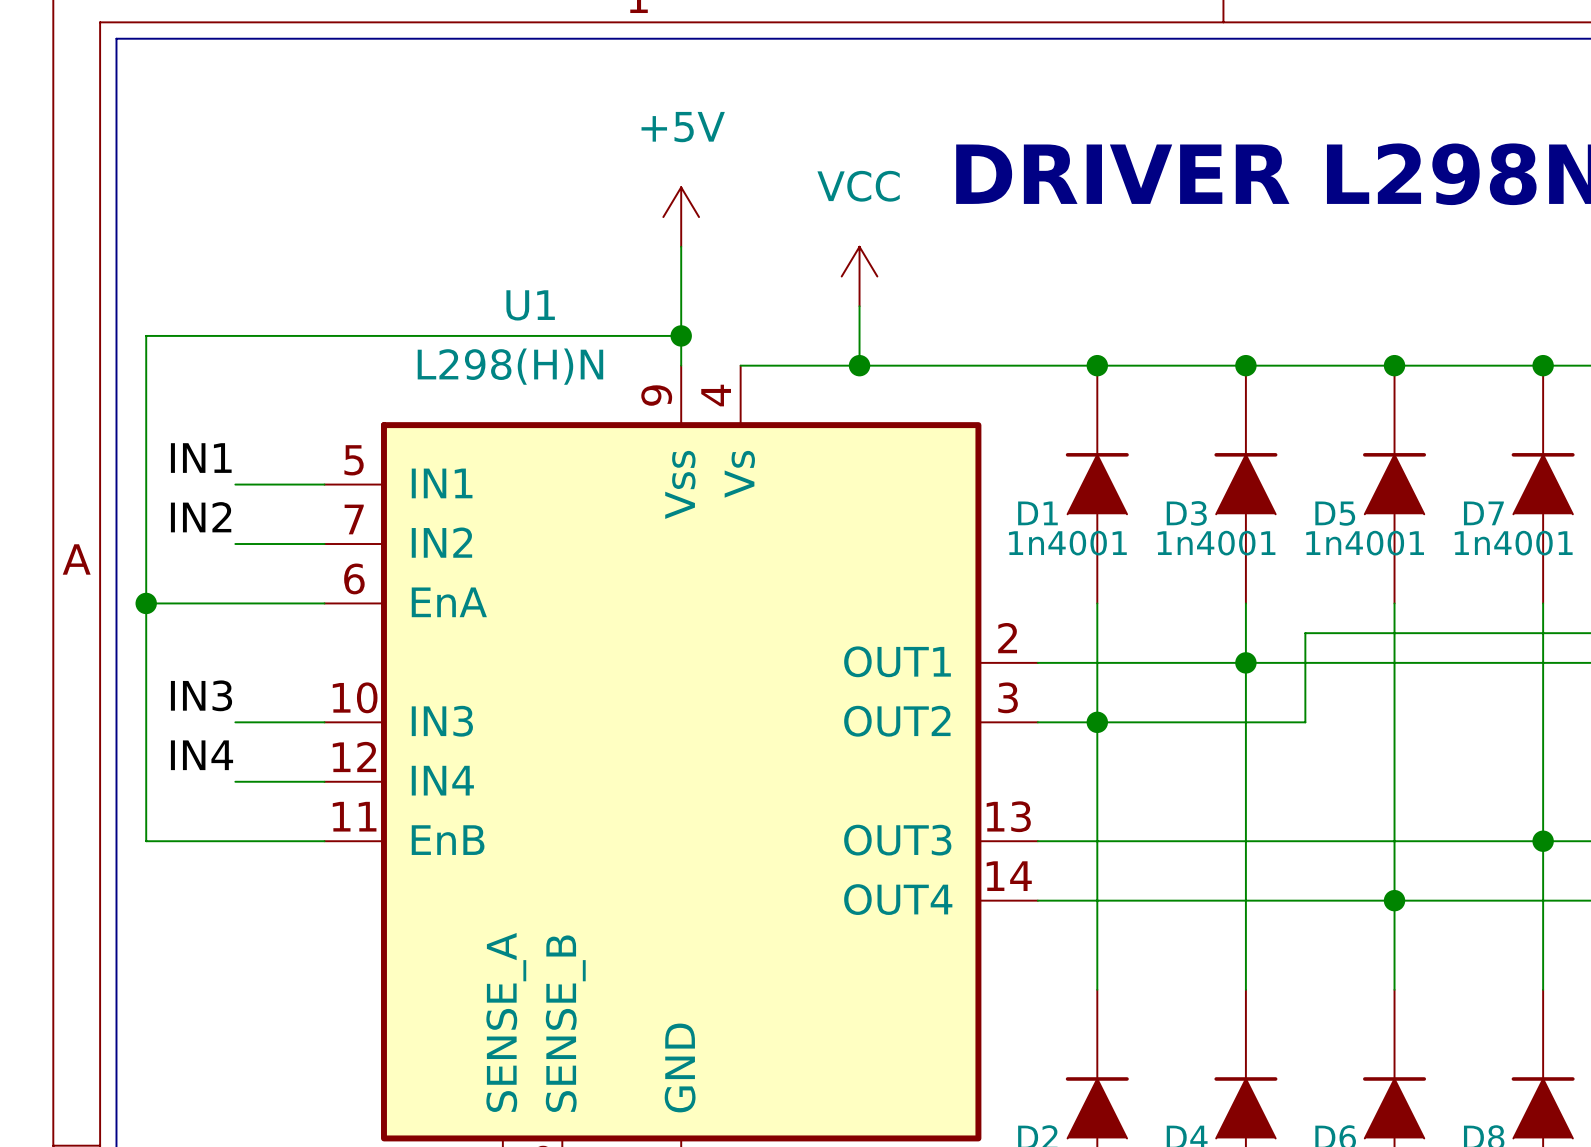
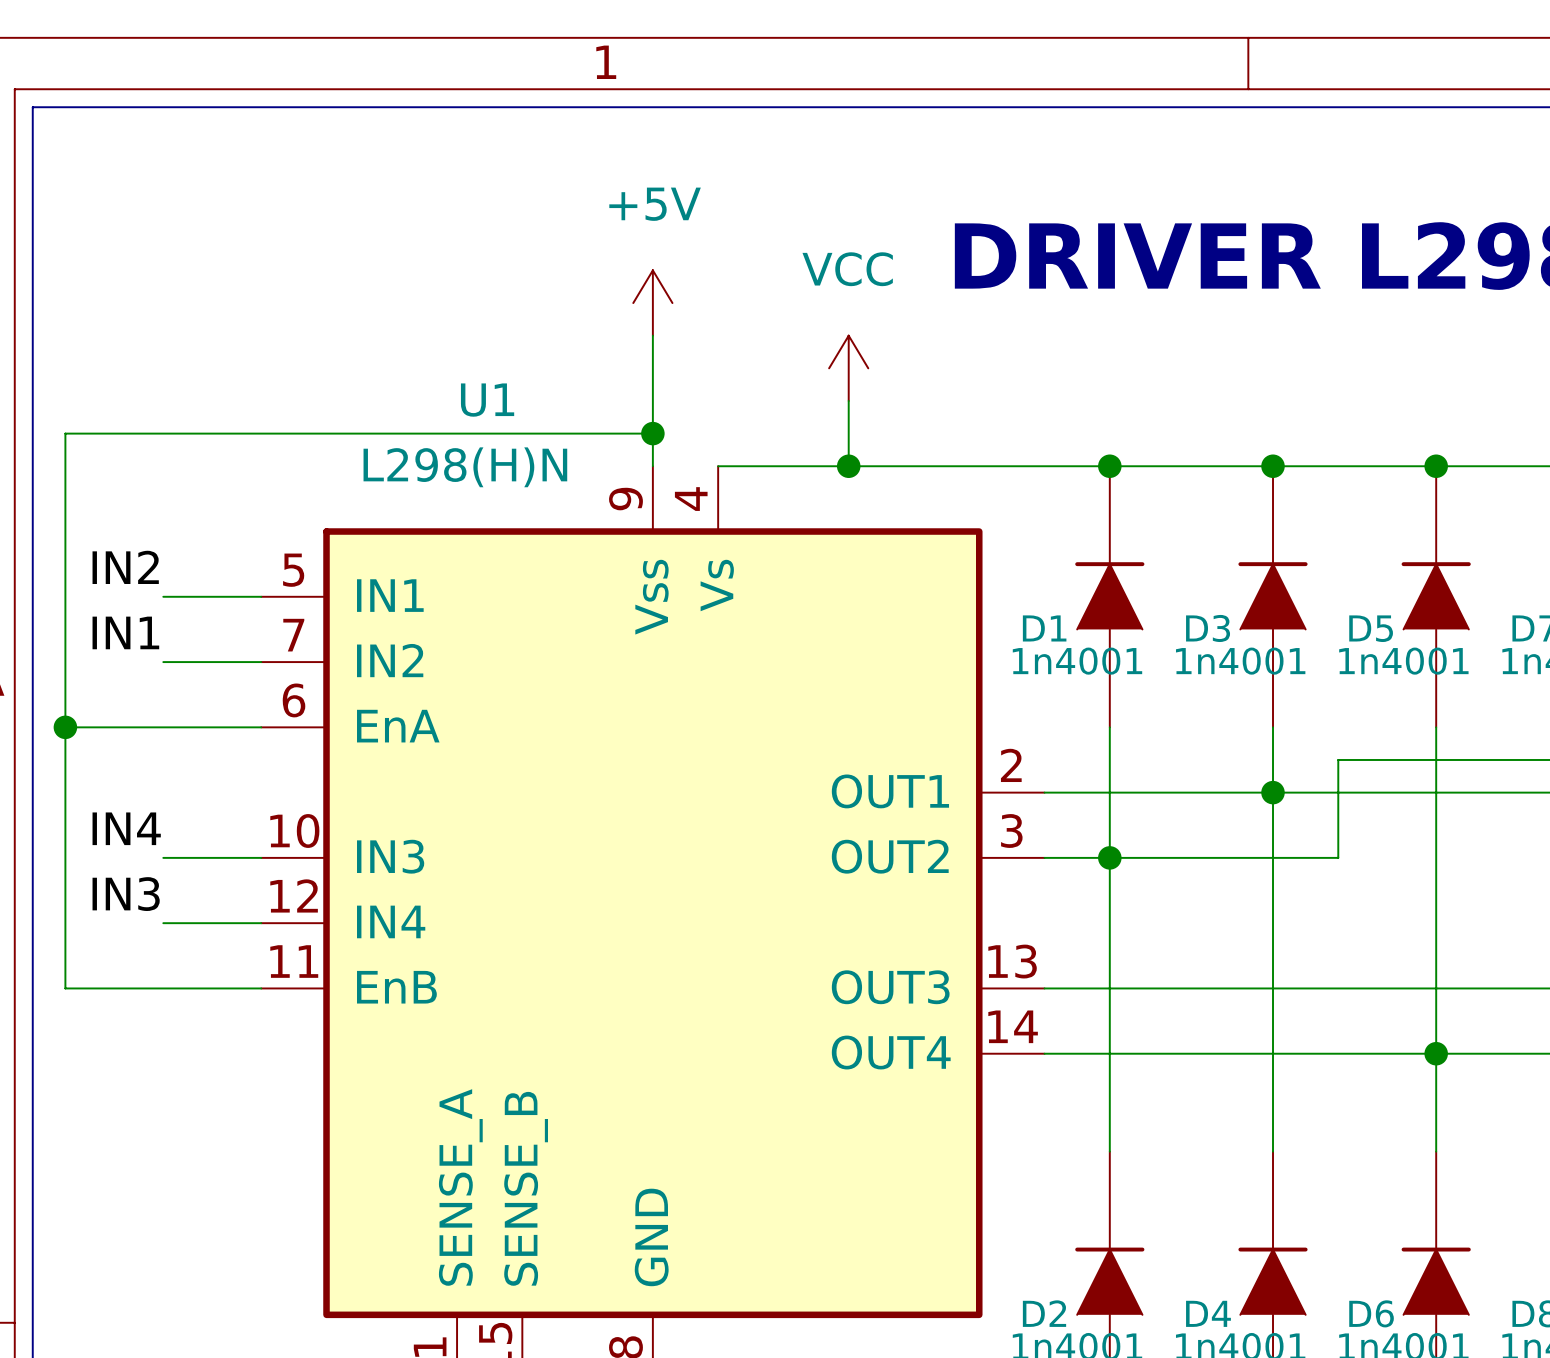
label: IN1 (201, 458) -> IN2 (125, 567)
label: IN2 (201, 517) -> IN1 (125, 632)
label: IN3 (201, 695) -> IN4 (126, 828)
label: IN4 (202, 755) -> IN3 (126, 894)

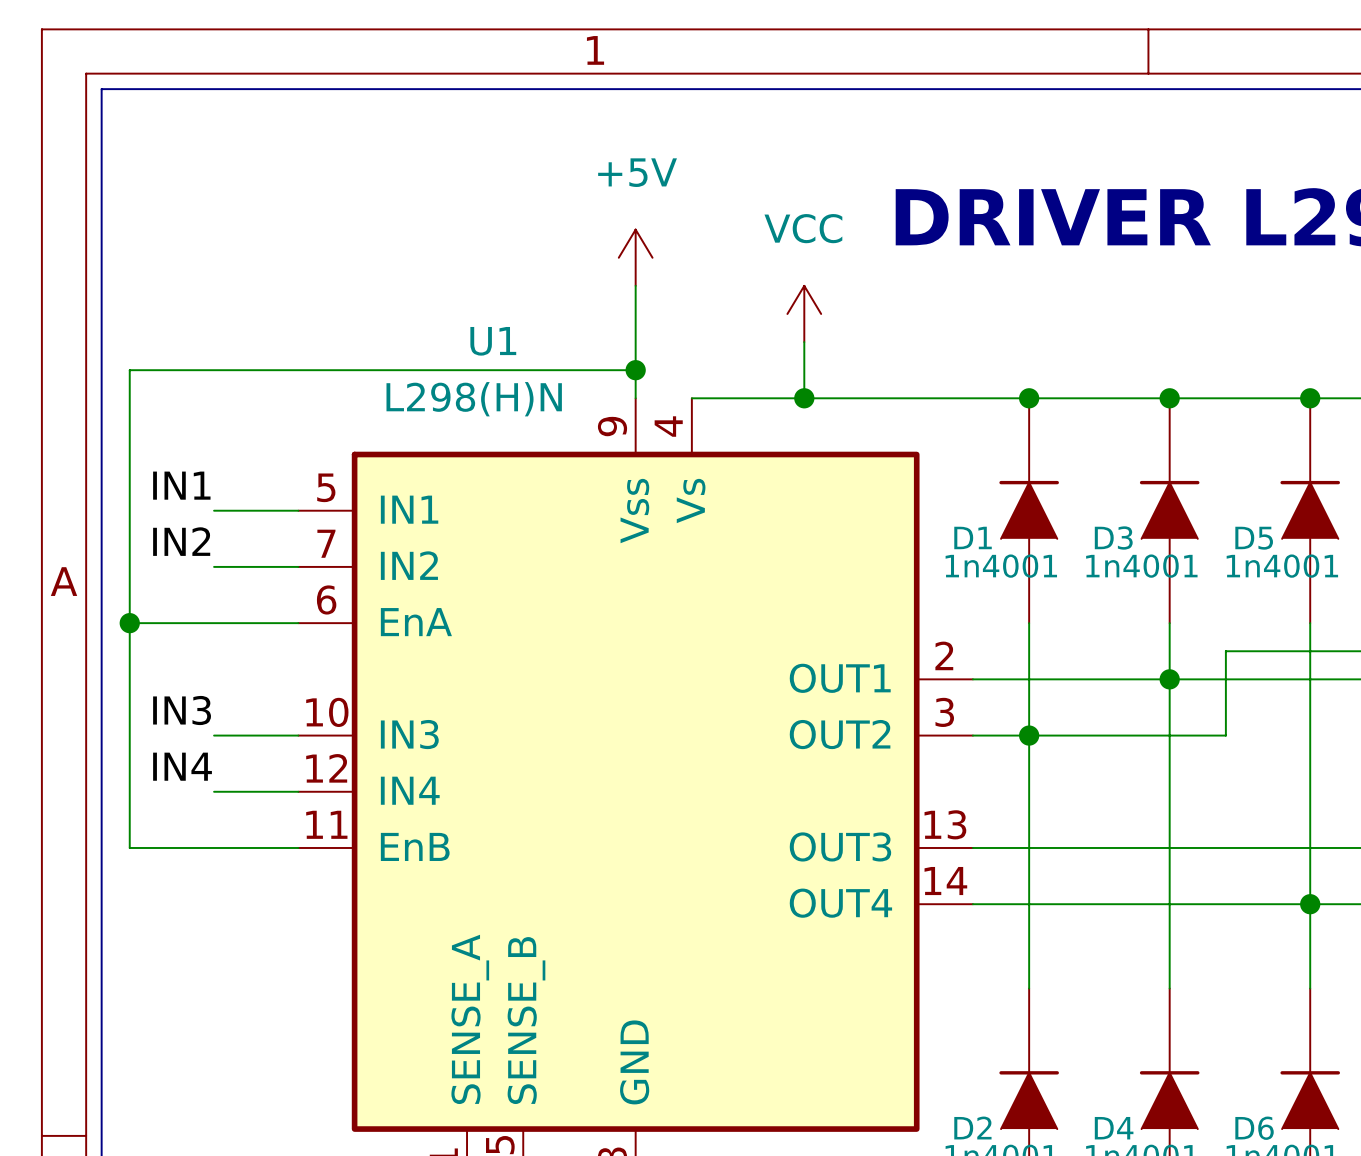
label: IN2 (125, 567) -> IN1 (181, 485)
label: IN1 (125, 632) -> IN2 (181, 541)
label: IN4 (126, 828) -> IN3 (182, 710)
label: IN3 (126, 894) -> IN4 (182, 766)

